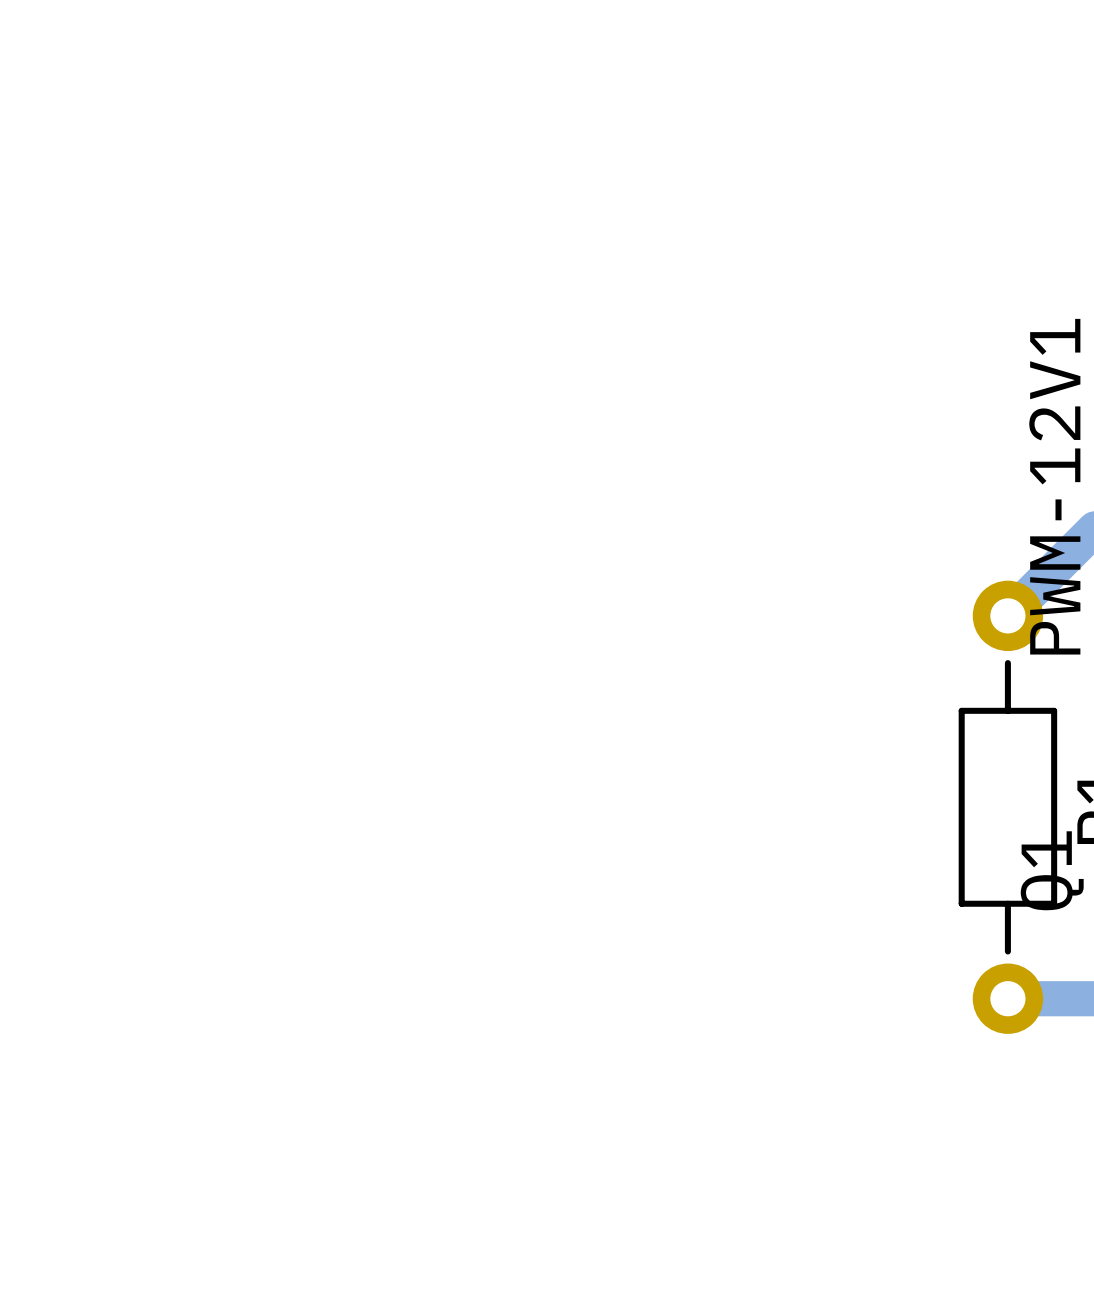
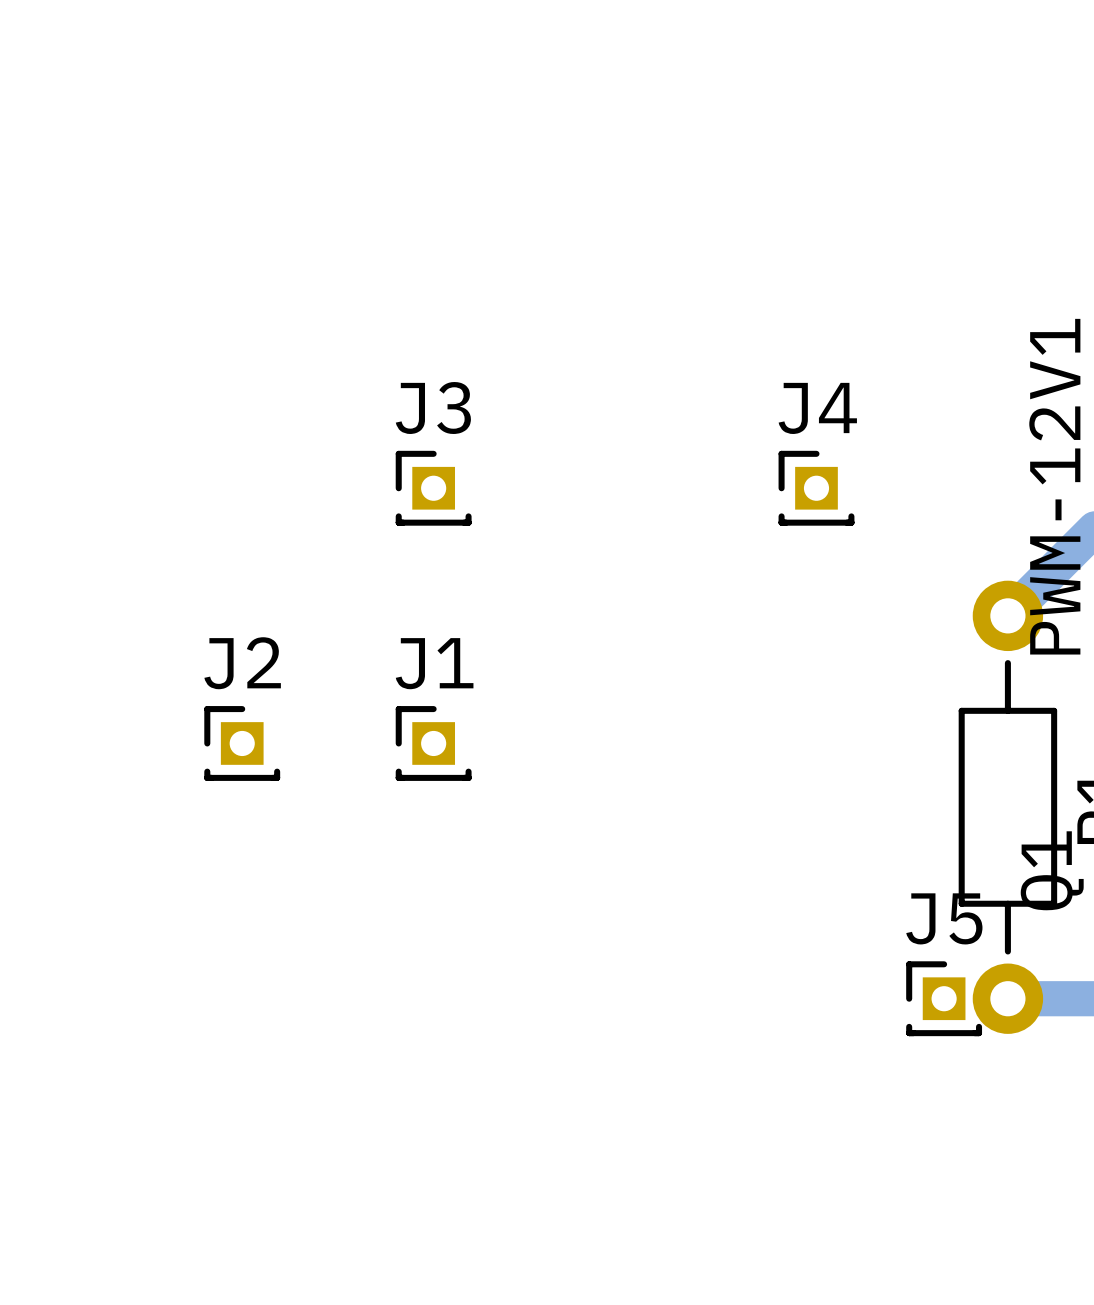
J3: none -> (433, 488)
J4: none -> (816, 488)
J2: none -> (242, 743)
J1: none -> (433, 743)
J5: none -> (944, 998)

